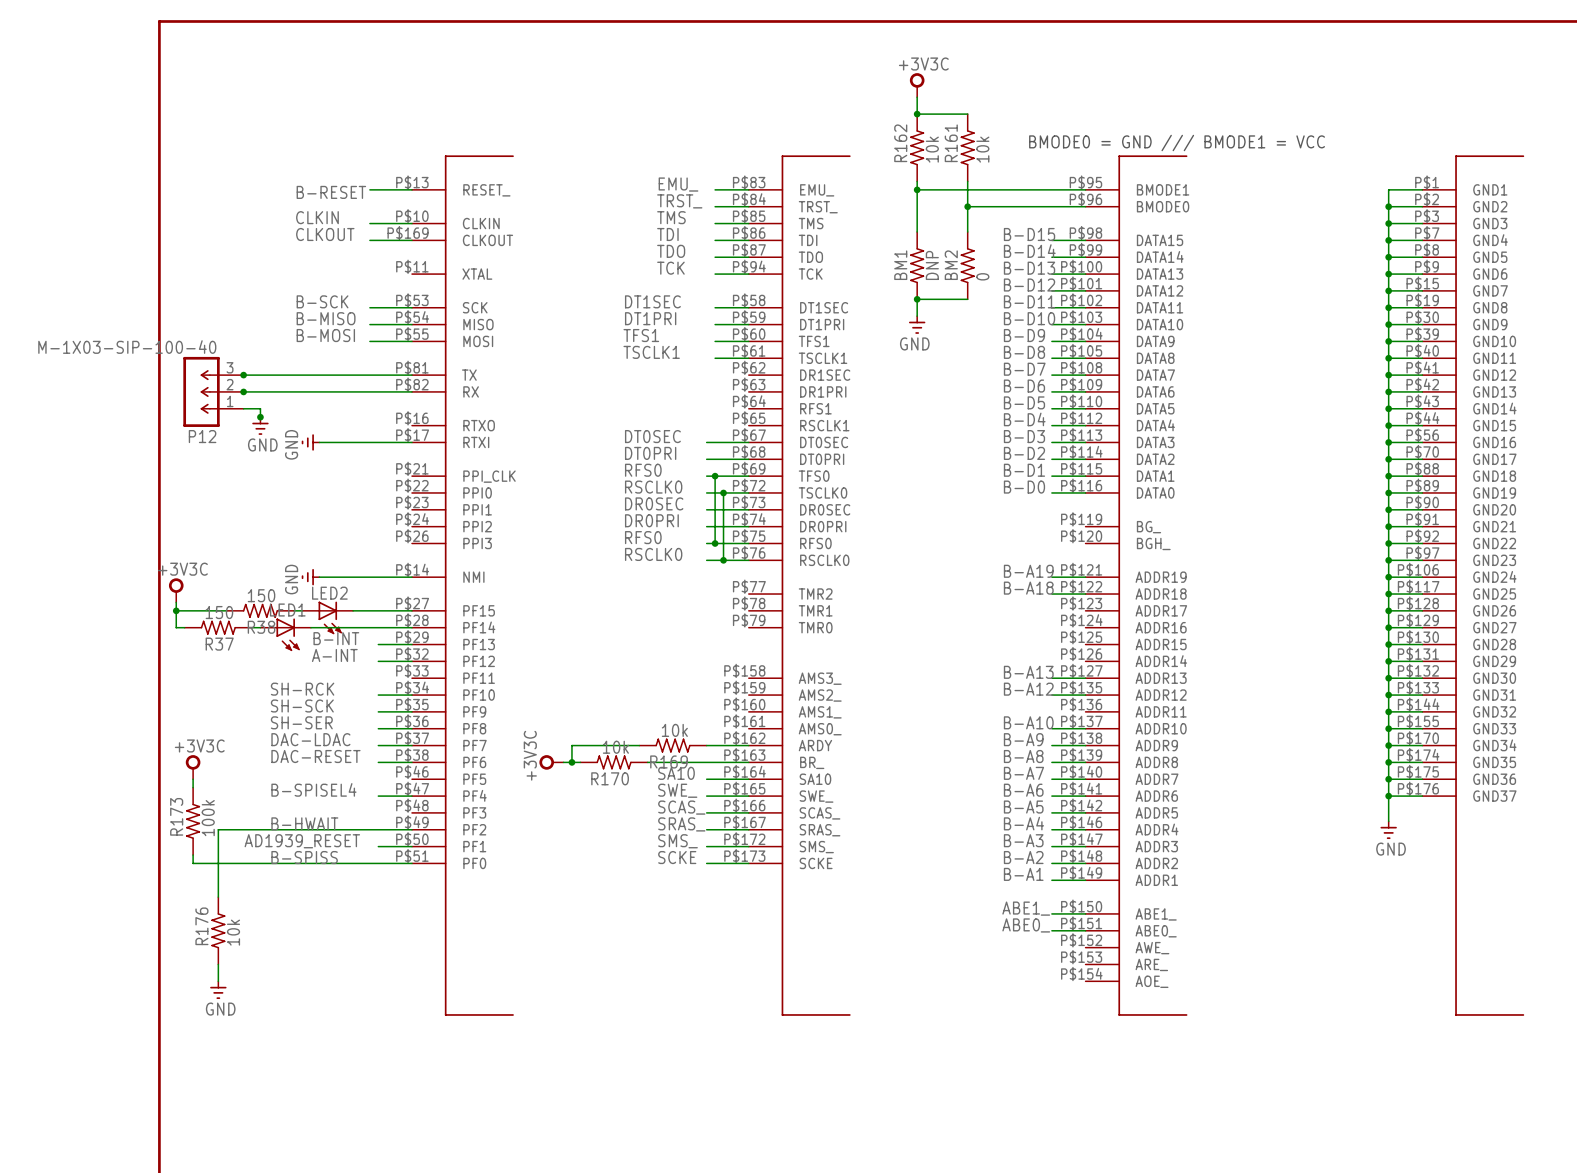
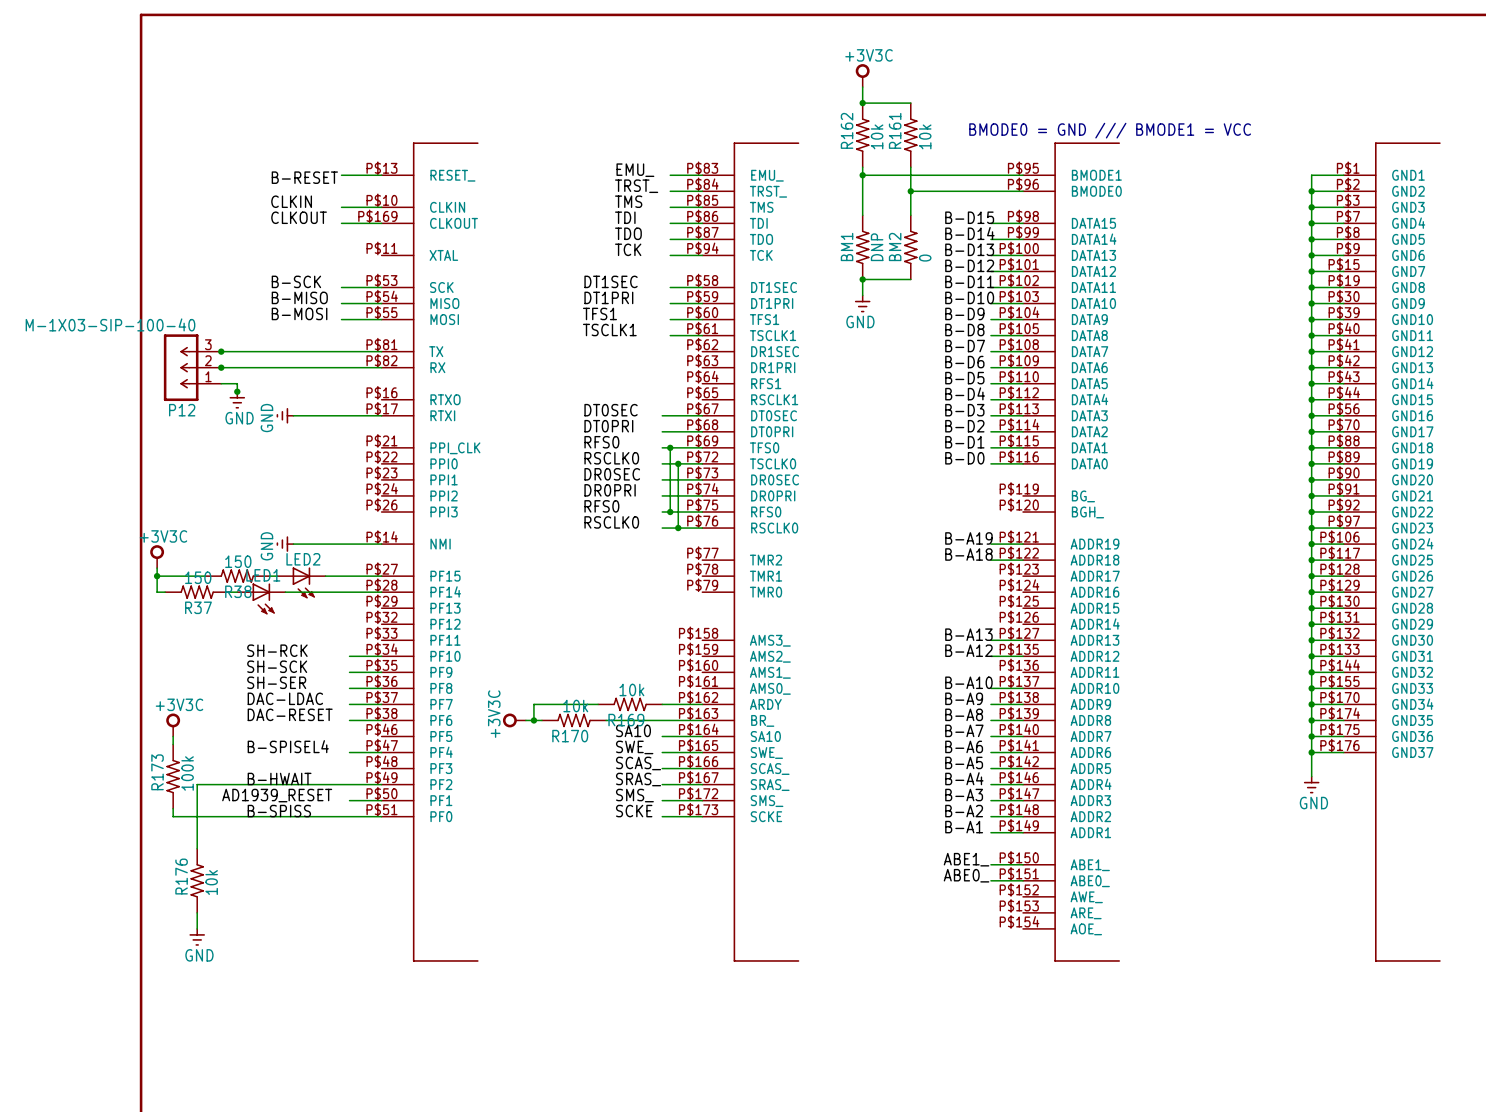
label: B-INT (336, 638) -> none
wire: (378, 644) (412, 644) -> none
label: A-INT (334, 655) -> none
wire: (378, 661) (412, 661) -> none

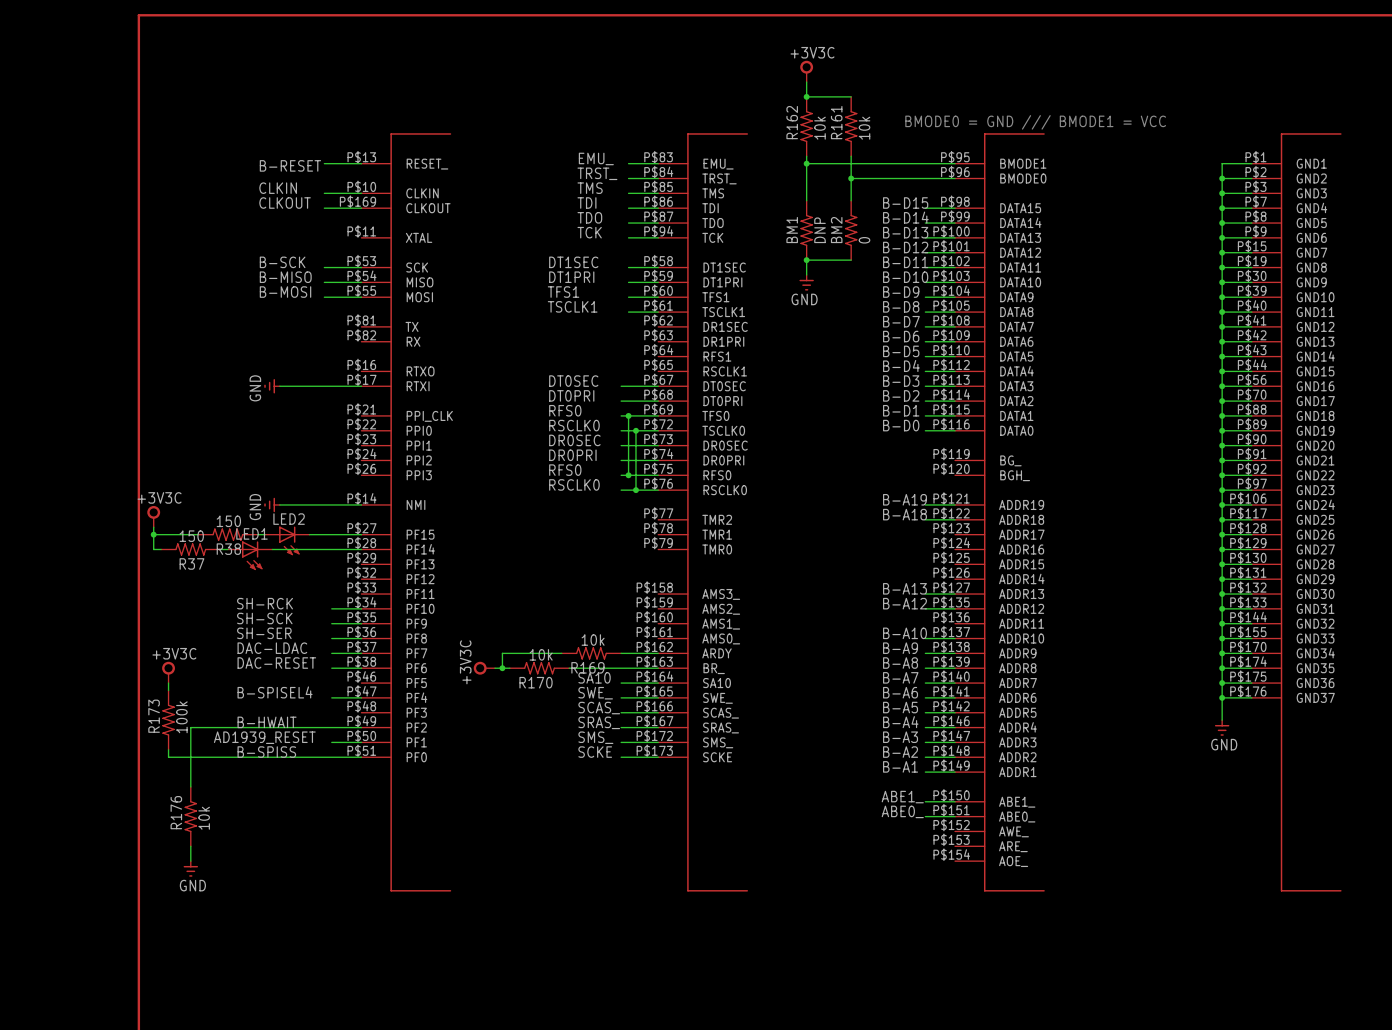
wire: (221, 351) (381, 351) -> none
junction: (221, 351) -> none
P12: M-1X03-SIP-100-40 (192, 367) -> none
wire: (221, 367) (381, 367) -> none
junction: (221, 367) -> none
wire: (221, 383) (237, 383) (237, 391) (235, 391) -> none
junction: (237, 391) -> none
power symbol: GND (237, 399) -> none

